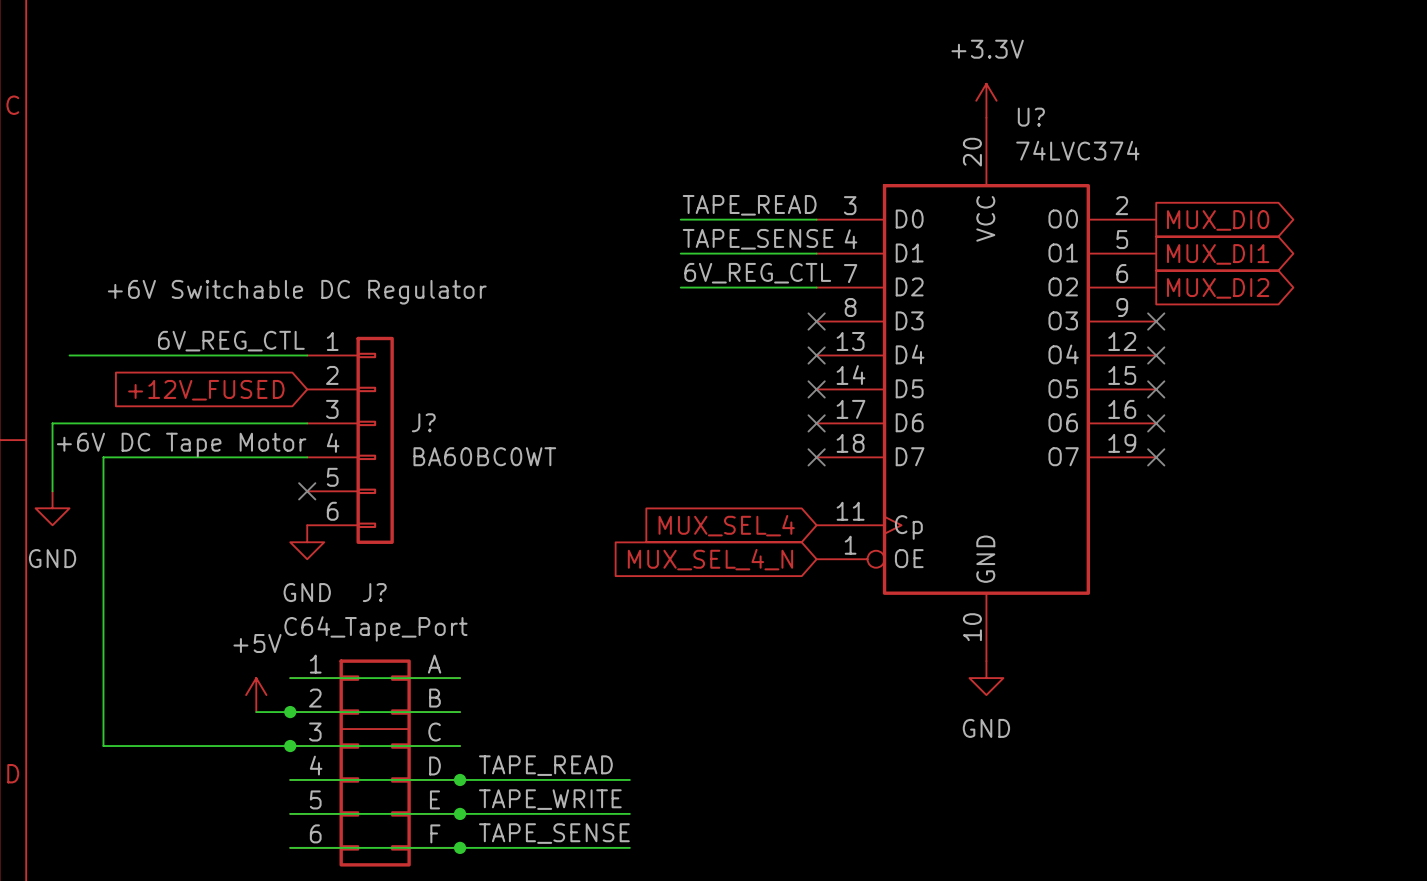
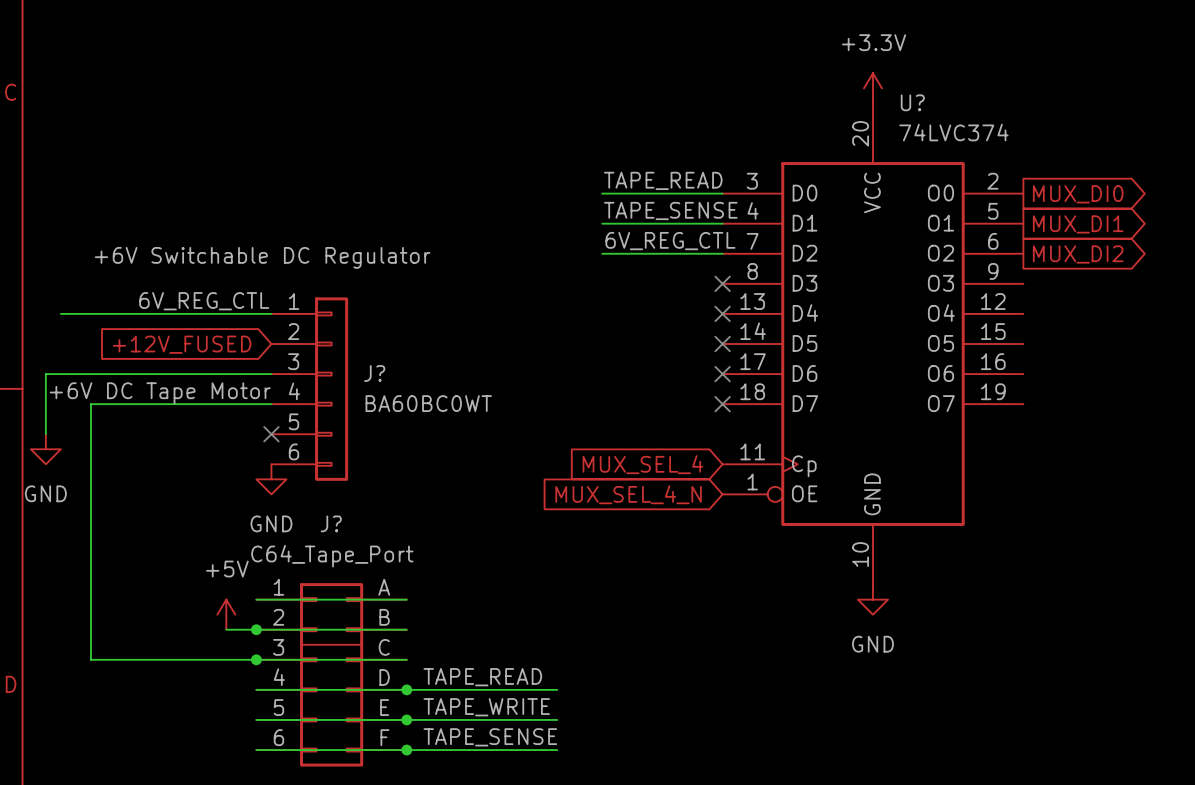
no-connect mark: (1156, 321) -> none
no-connect mark: (1156, 355) -> none
no-connect mark: (1156, 389) -> none
no-connect mark: (1156, 423) -> none
no-connect mark: (1156, 457) -> none

